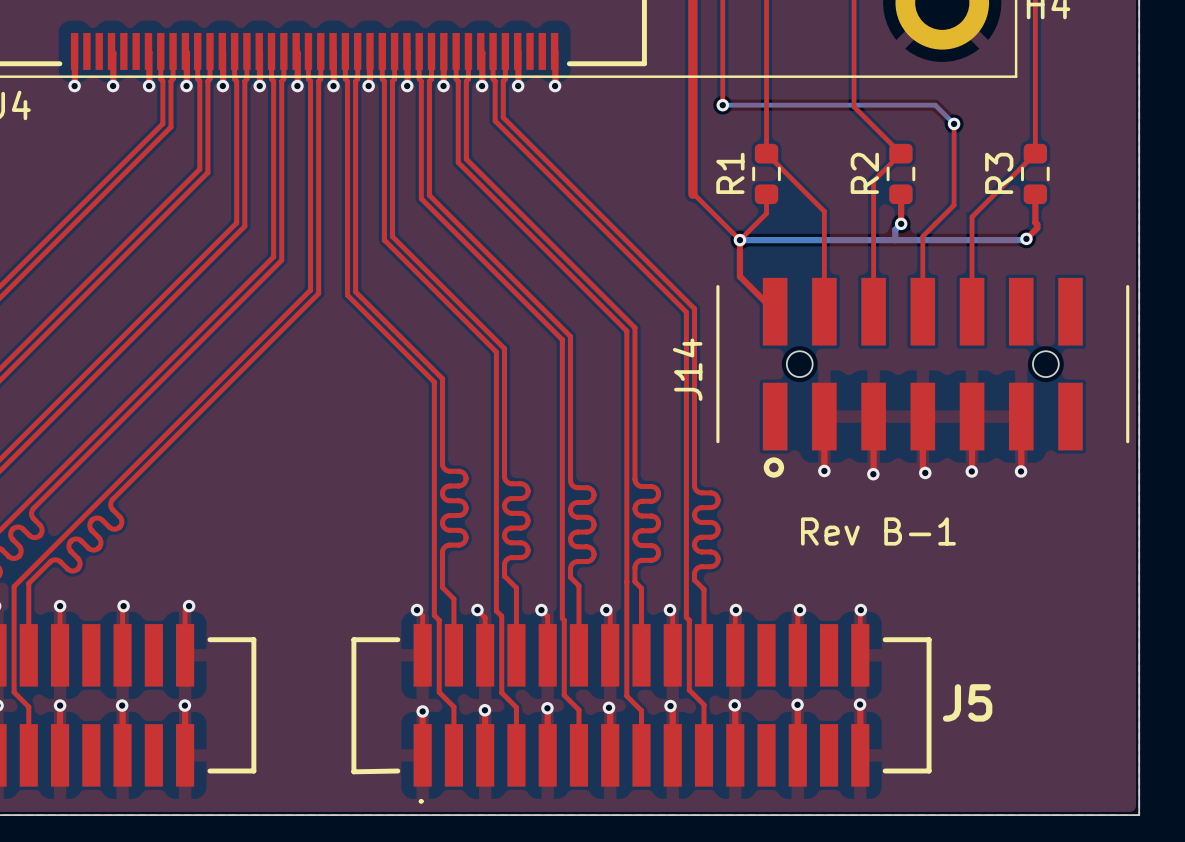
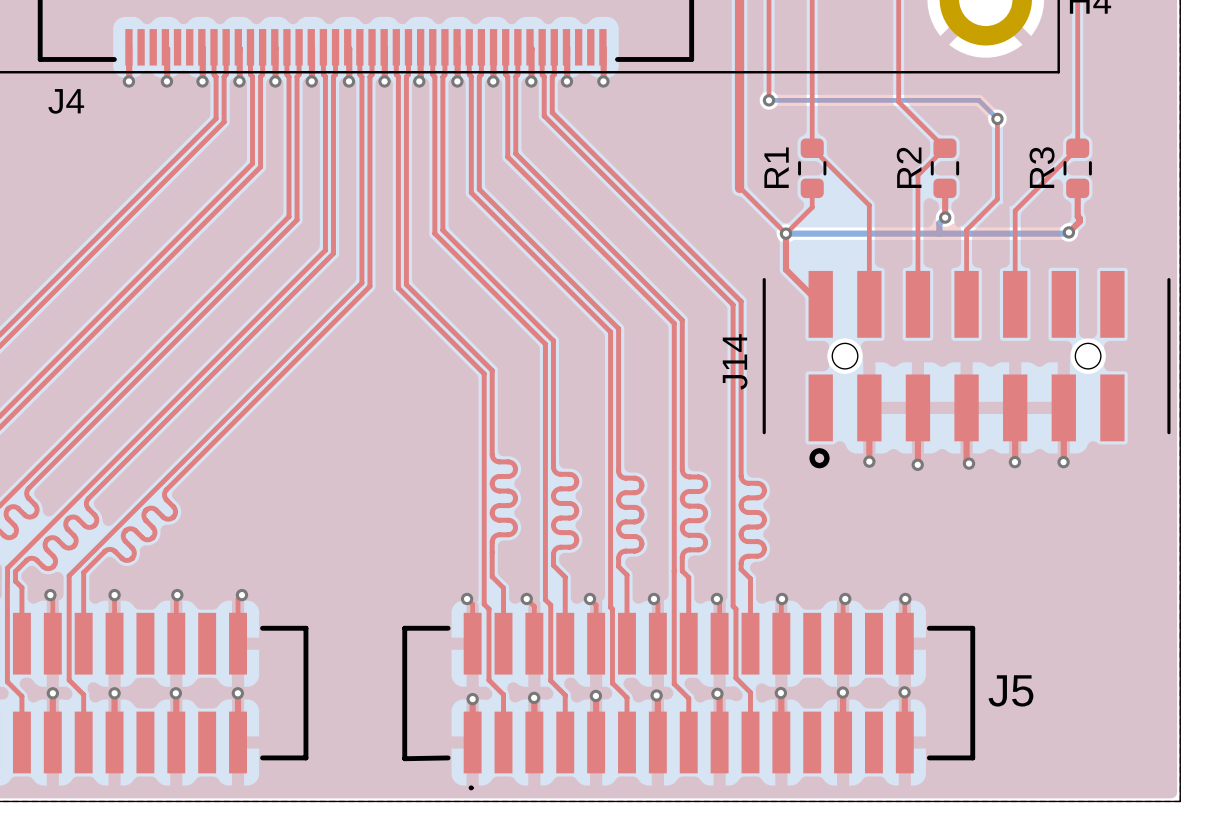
text: Rev B-1 (878, 531) -> none

